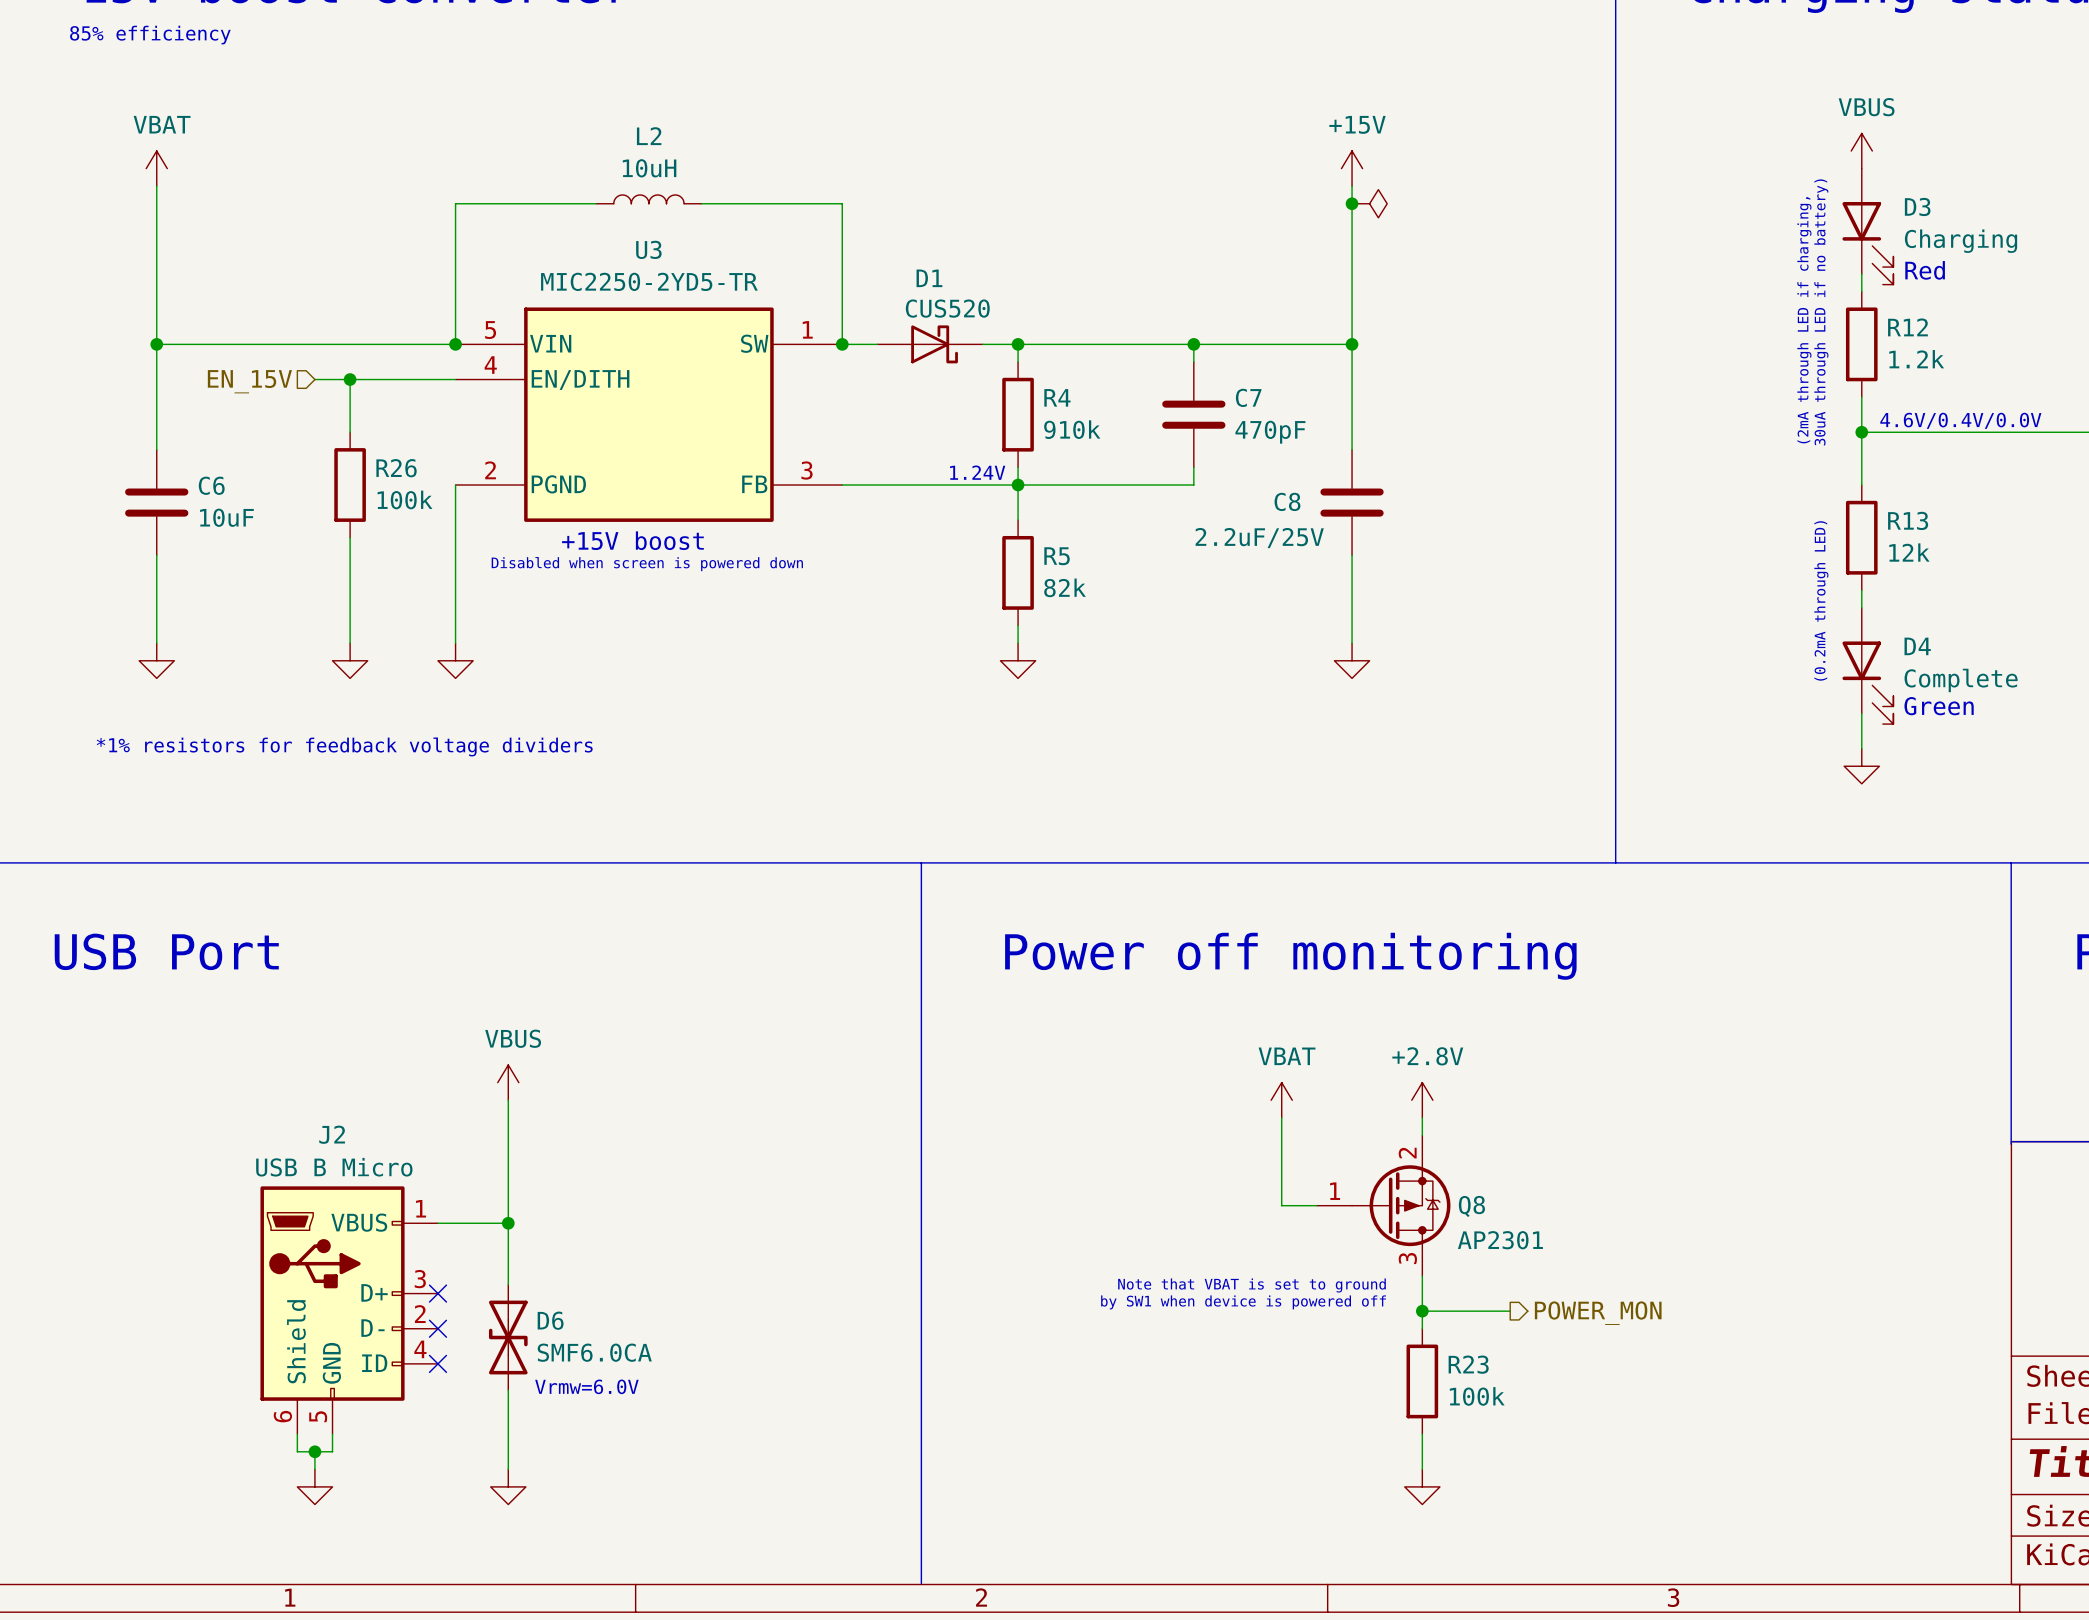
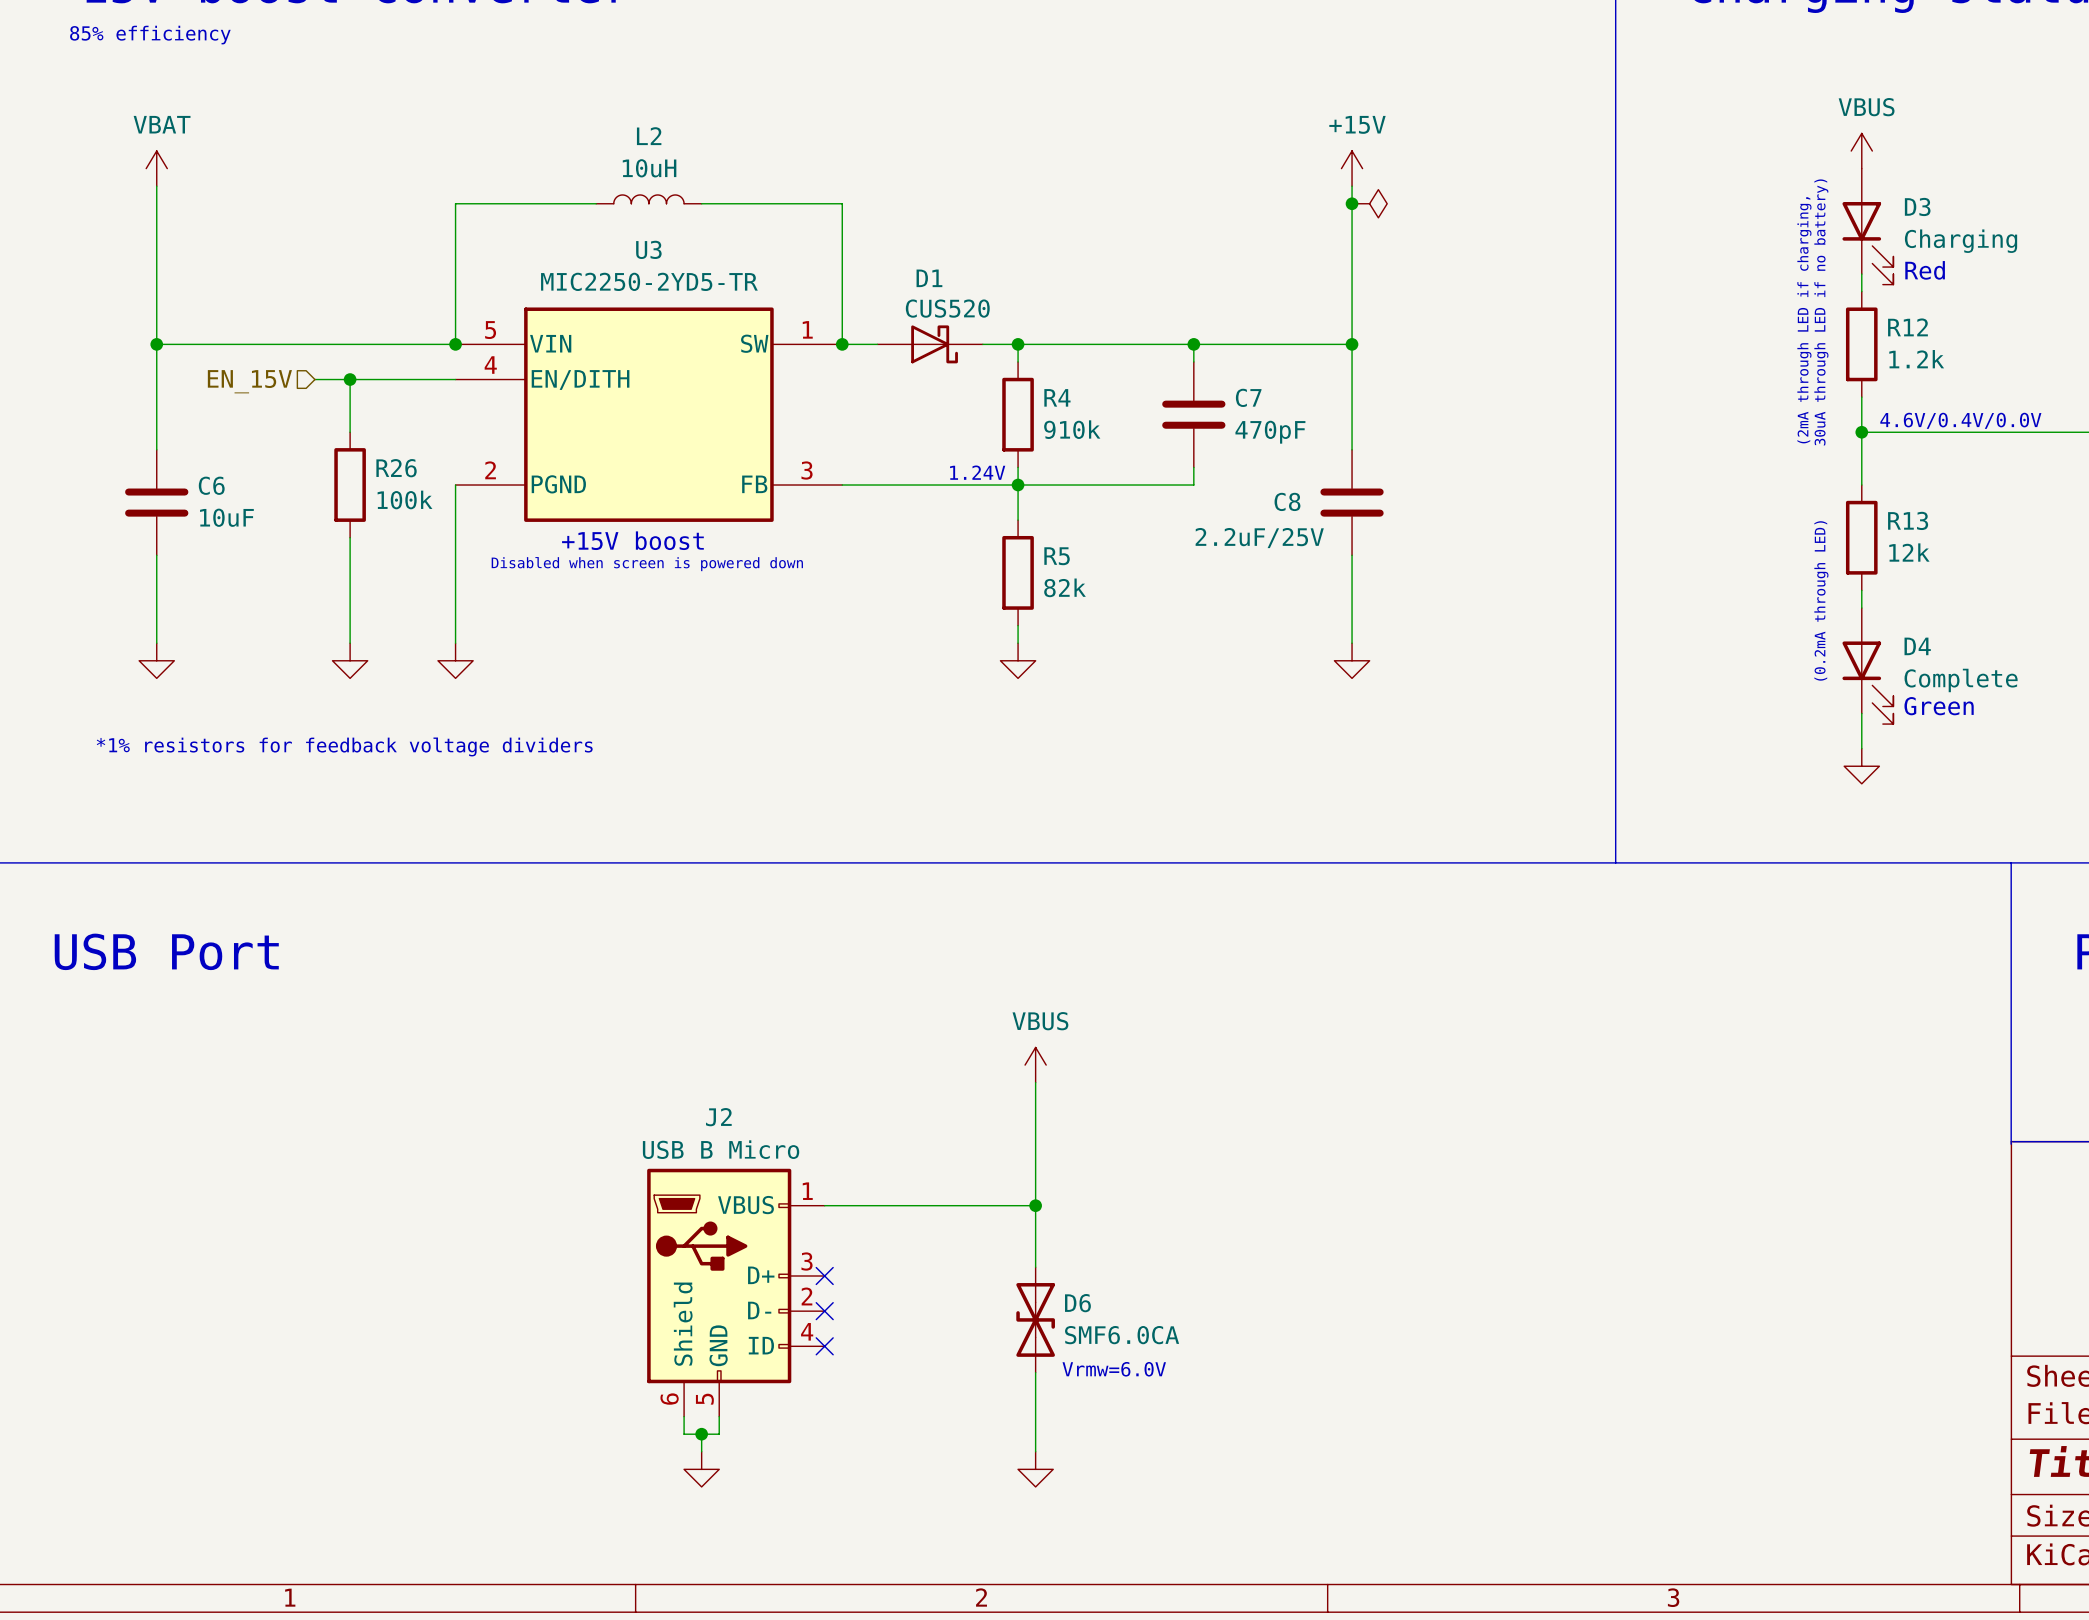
line: (921, 862) (921, 1583) -> none
text: Power off monitoring (1290, 956) -> none
power symbol: none -> VBUS (1035, 1065)
power symbol: VBUS (508, 1082) -> none
wire: none -> (1035, 1082) (1035, 1267)
wire: (508, 1100) (508, 1284) -> none
power symbol: VBAT (1281, 1100) -> none
power symbol: +2.8V (1422, 1100) -> none
wire: (1281, 1117) (1281, 1205) (1316, 1205) -> none
wire: (1422, 1117) (1422, 1135) -> none
wire: none -> (824, 1205) (1035, 1205)
junction: none -> (1035, 1205)
Q8: AP2301 (1383, 1205) -> none
wire: (437, 1223) (508, 1223) -> none
junction: (508, 1223) -> none
no-connect mark: none -> (824, 1276)
wire: (1422, 1276) (1422, 1328) -> none
text: Note that VBAT is set to ground (1252, 1285) -> none
no-connect mark: (437, 1293) -> none
text: by SW1 when device is powered off (1243, 1302) -> none
J2 position: (349, 1310) -> (735, 1292)
no-connect mark: none -> (824, 1311)
wire: (1422, 1311) (1510, 1311) -> none
junction: (1422, 1311) -> none
hierarchical label: POWER_MON (1598, 1313) -> none
no-connect mark: (437, 1328) -> none
D6 position: (508, 1337) -> (1035, 1319)
no-connect mark: none -> (824, 1346)
no-connect mark: (437, 1363) -> none
text: none -> Vrmw=6.0V (1114, 1369)
wire: none -> (1035, 1372) (1035, 1451)
R23: 100k (1422, 1381) -> none
text: Vrmw=6.0V (586, 1386) -> none
wire: (508, 1390) (508, 1469) -> none
wire: none -> (684, 1416) (684, 1434) (719, 1434) (719, 1416)
wire: (297, 1434) (297, 1451) (332, 1451) (332, 1434) -> none
wire: none -> (701, 1434) (701, 1451)
junction: none -> (701, 1434)
wire: (1422, 1434) (1422, 1469) -> none
wire: (314, 1451) (314, 1469) -> none
junction: (314, 1451) -> none
power symbol: none -> (701, 1469)
power symbol: none -> (1035, 1469)
power symbol: (314, 1486) -> none
power symbol: (508, 1486) -> none
power symbol: (1422, 1486) -> none

